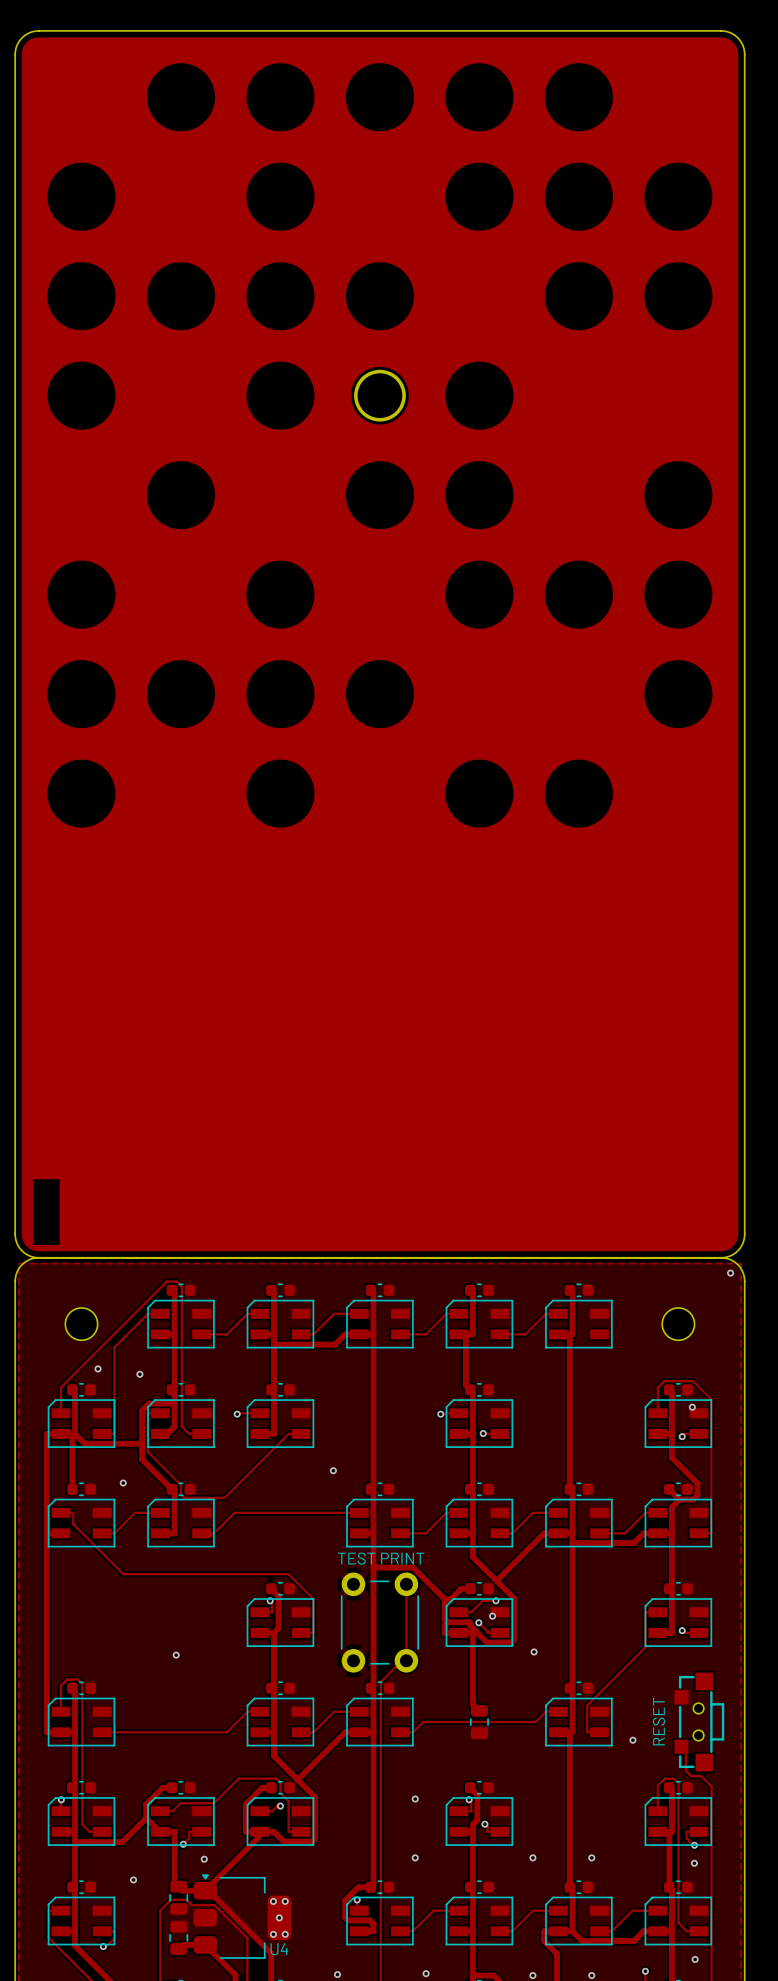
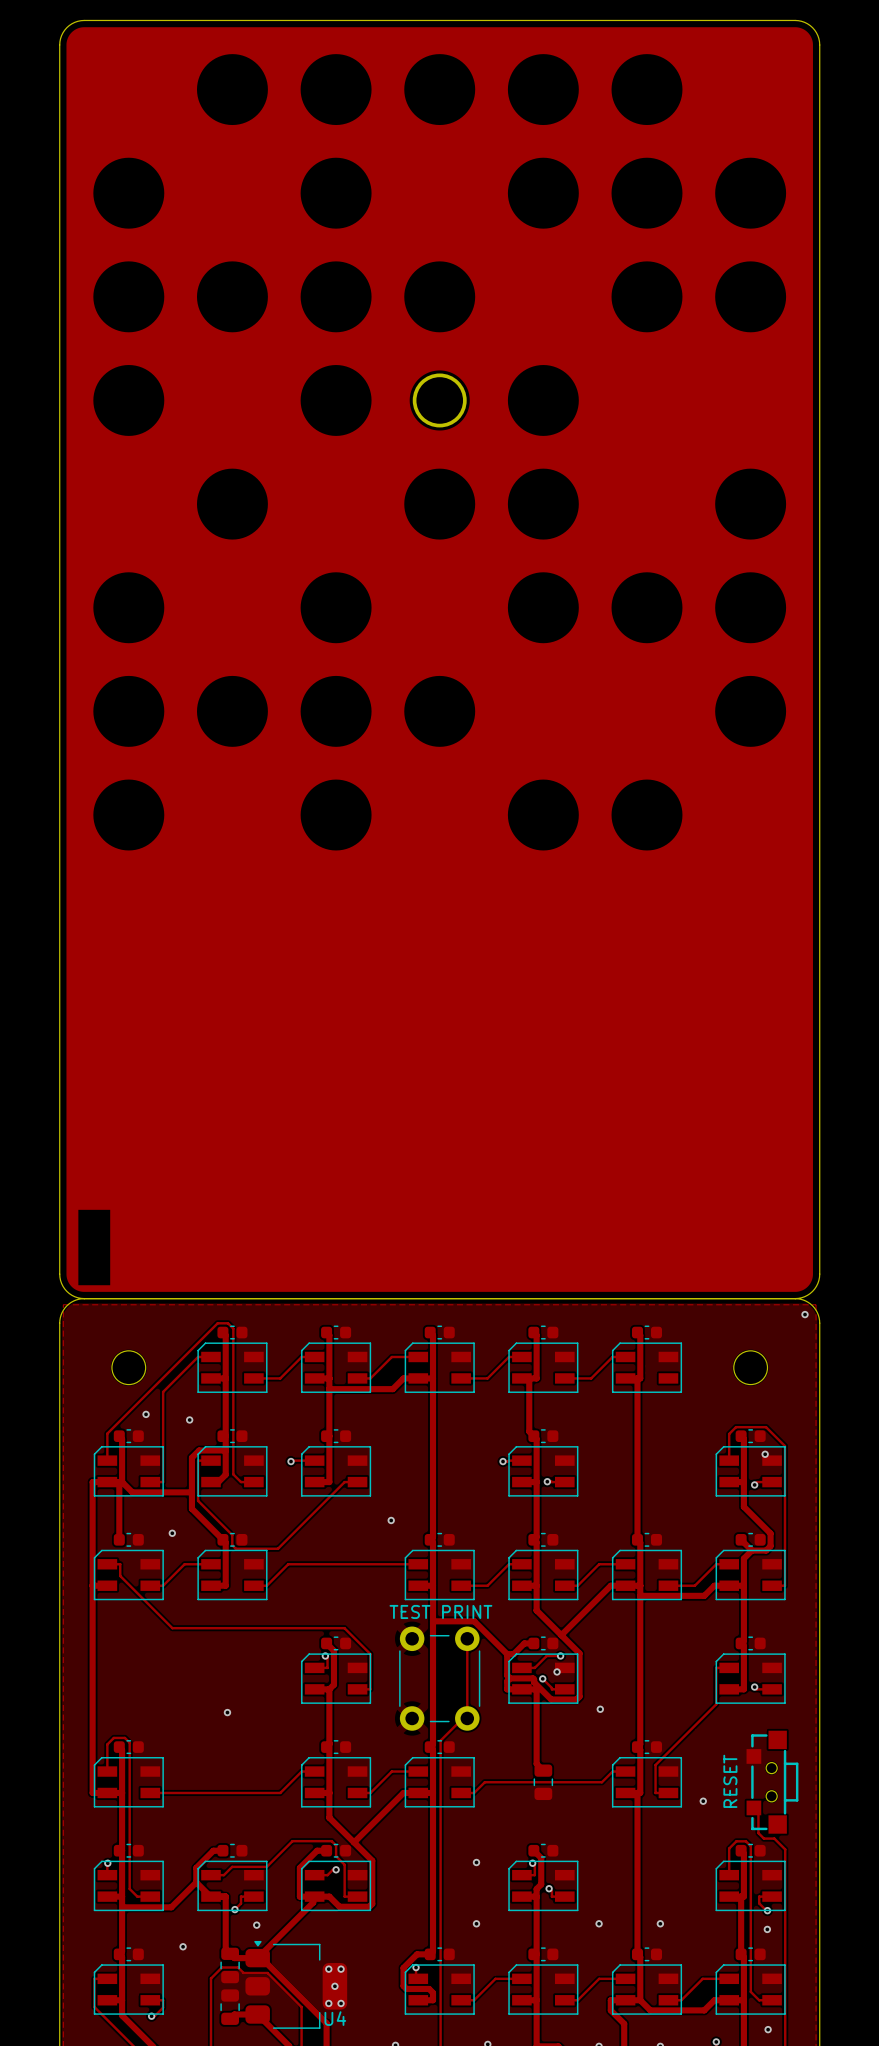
drawing shape: [21, 37, 739, 1252] -> [66, 27, 813, 1292]

